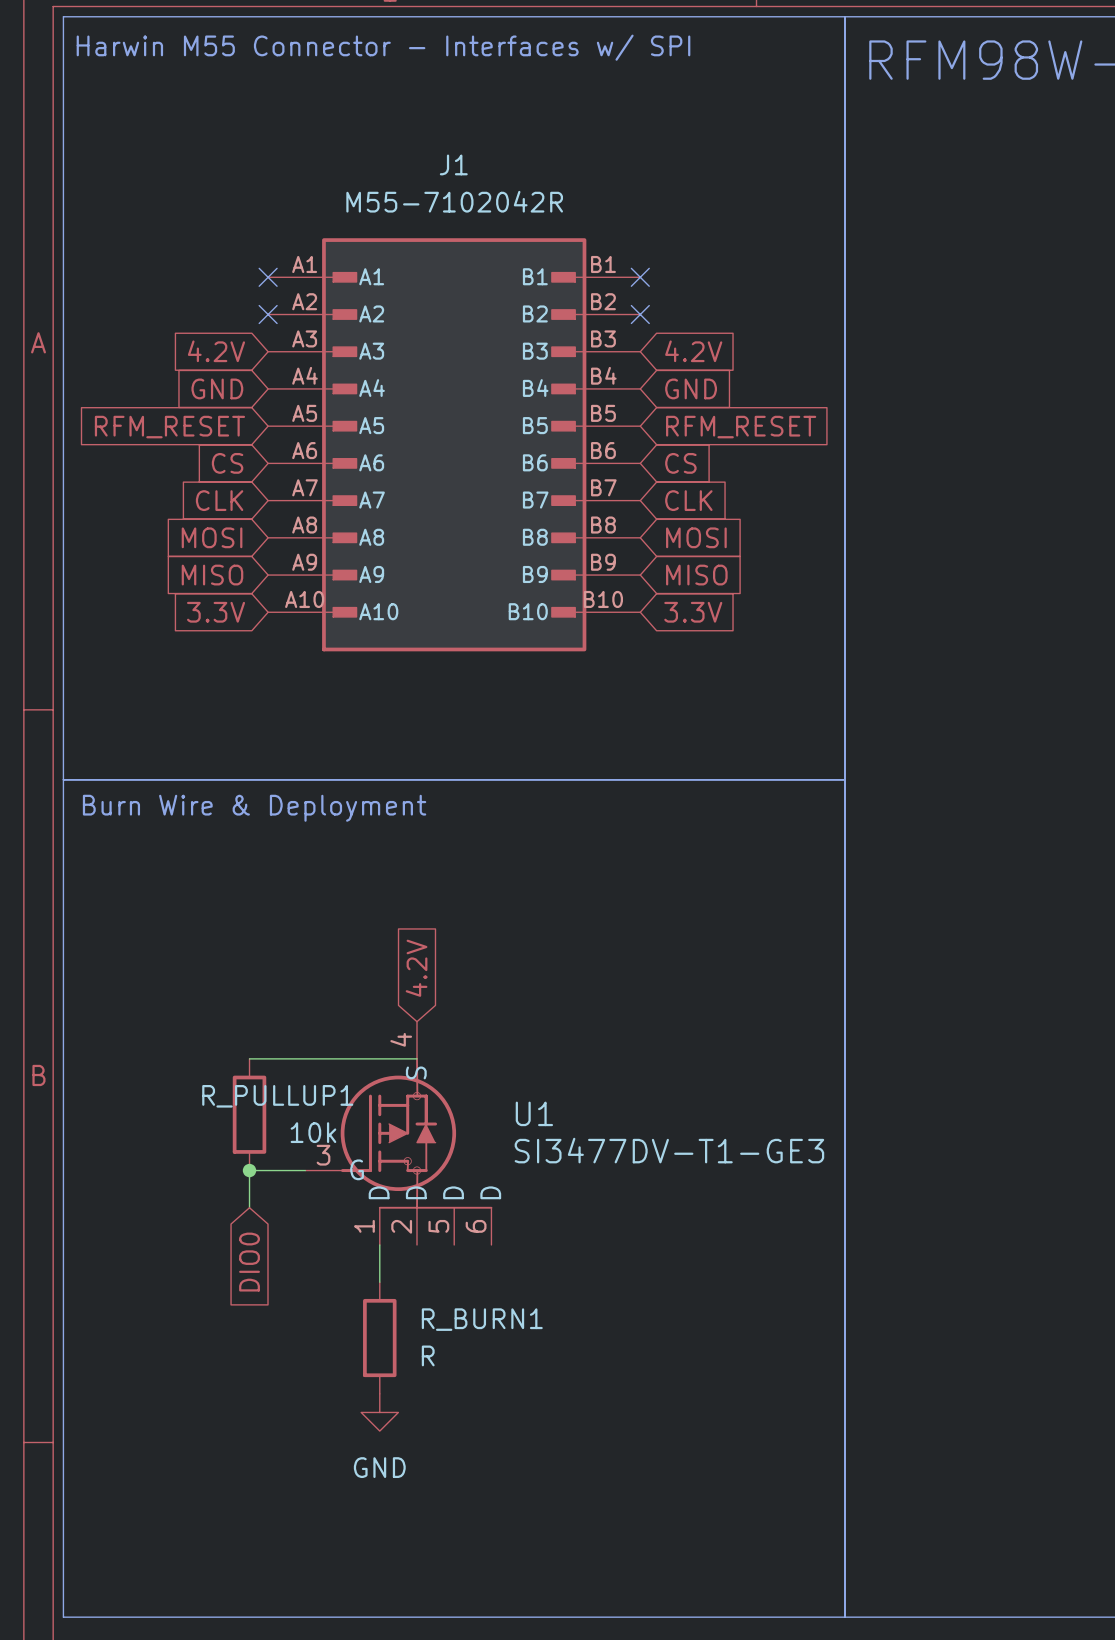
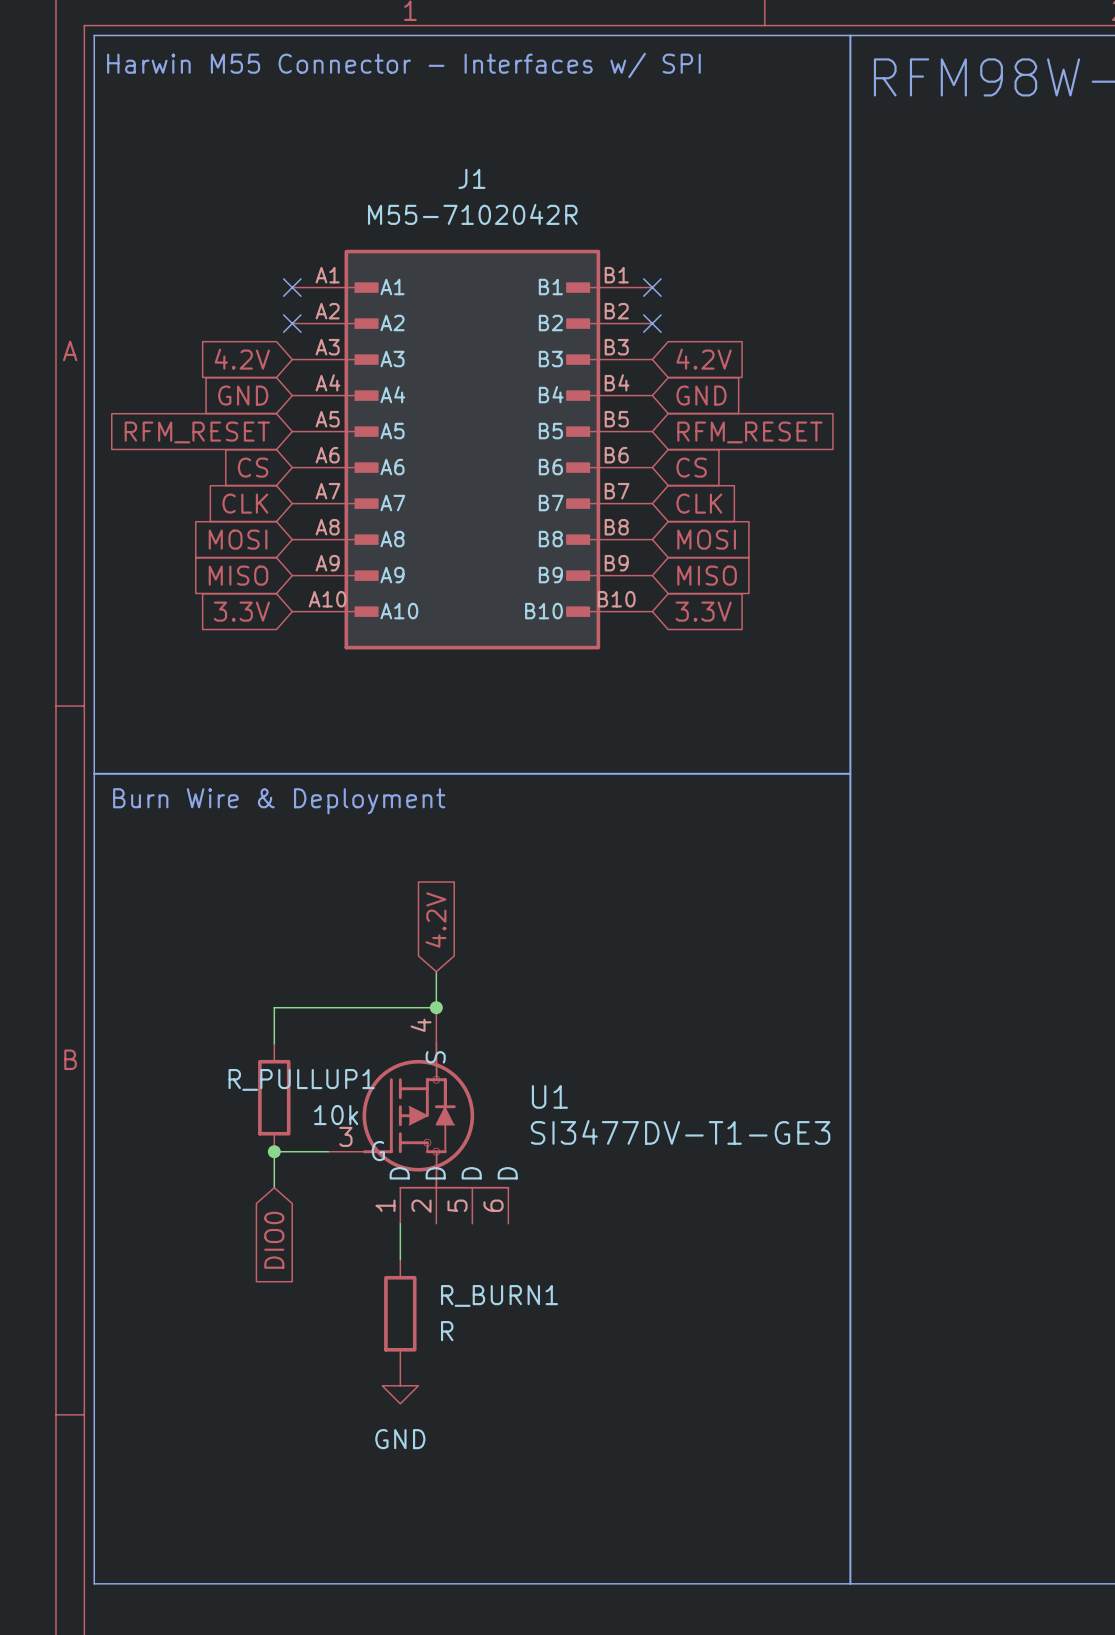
global label position: 4.2V (416, 968) -> 4.2V (435, 920)
junction: none -> (436, 1007)
wire: (249, 1058) (417, 1058) -> (274, 1043) (274, 1007) (436, 1007) (436, 971)

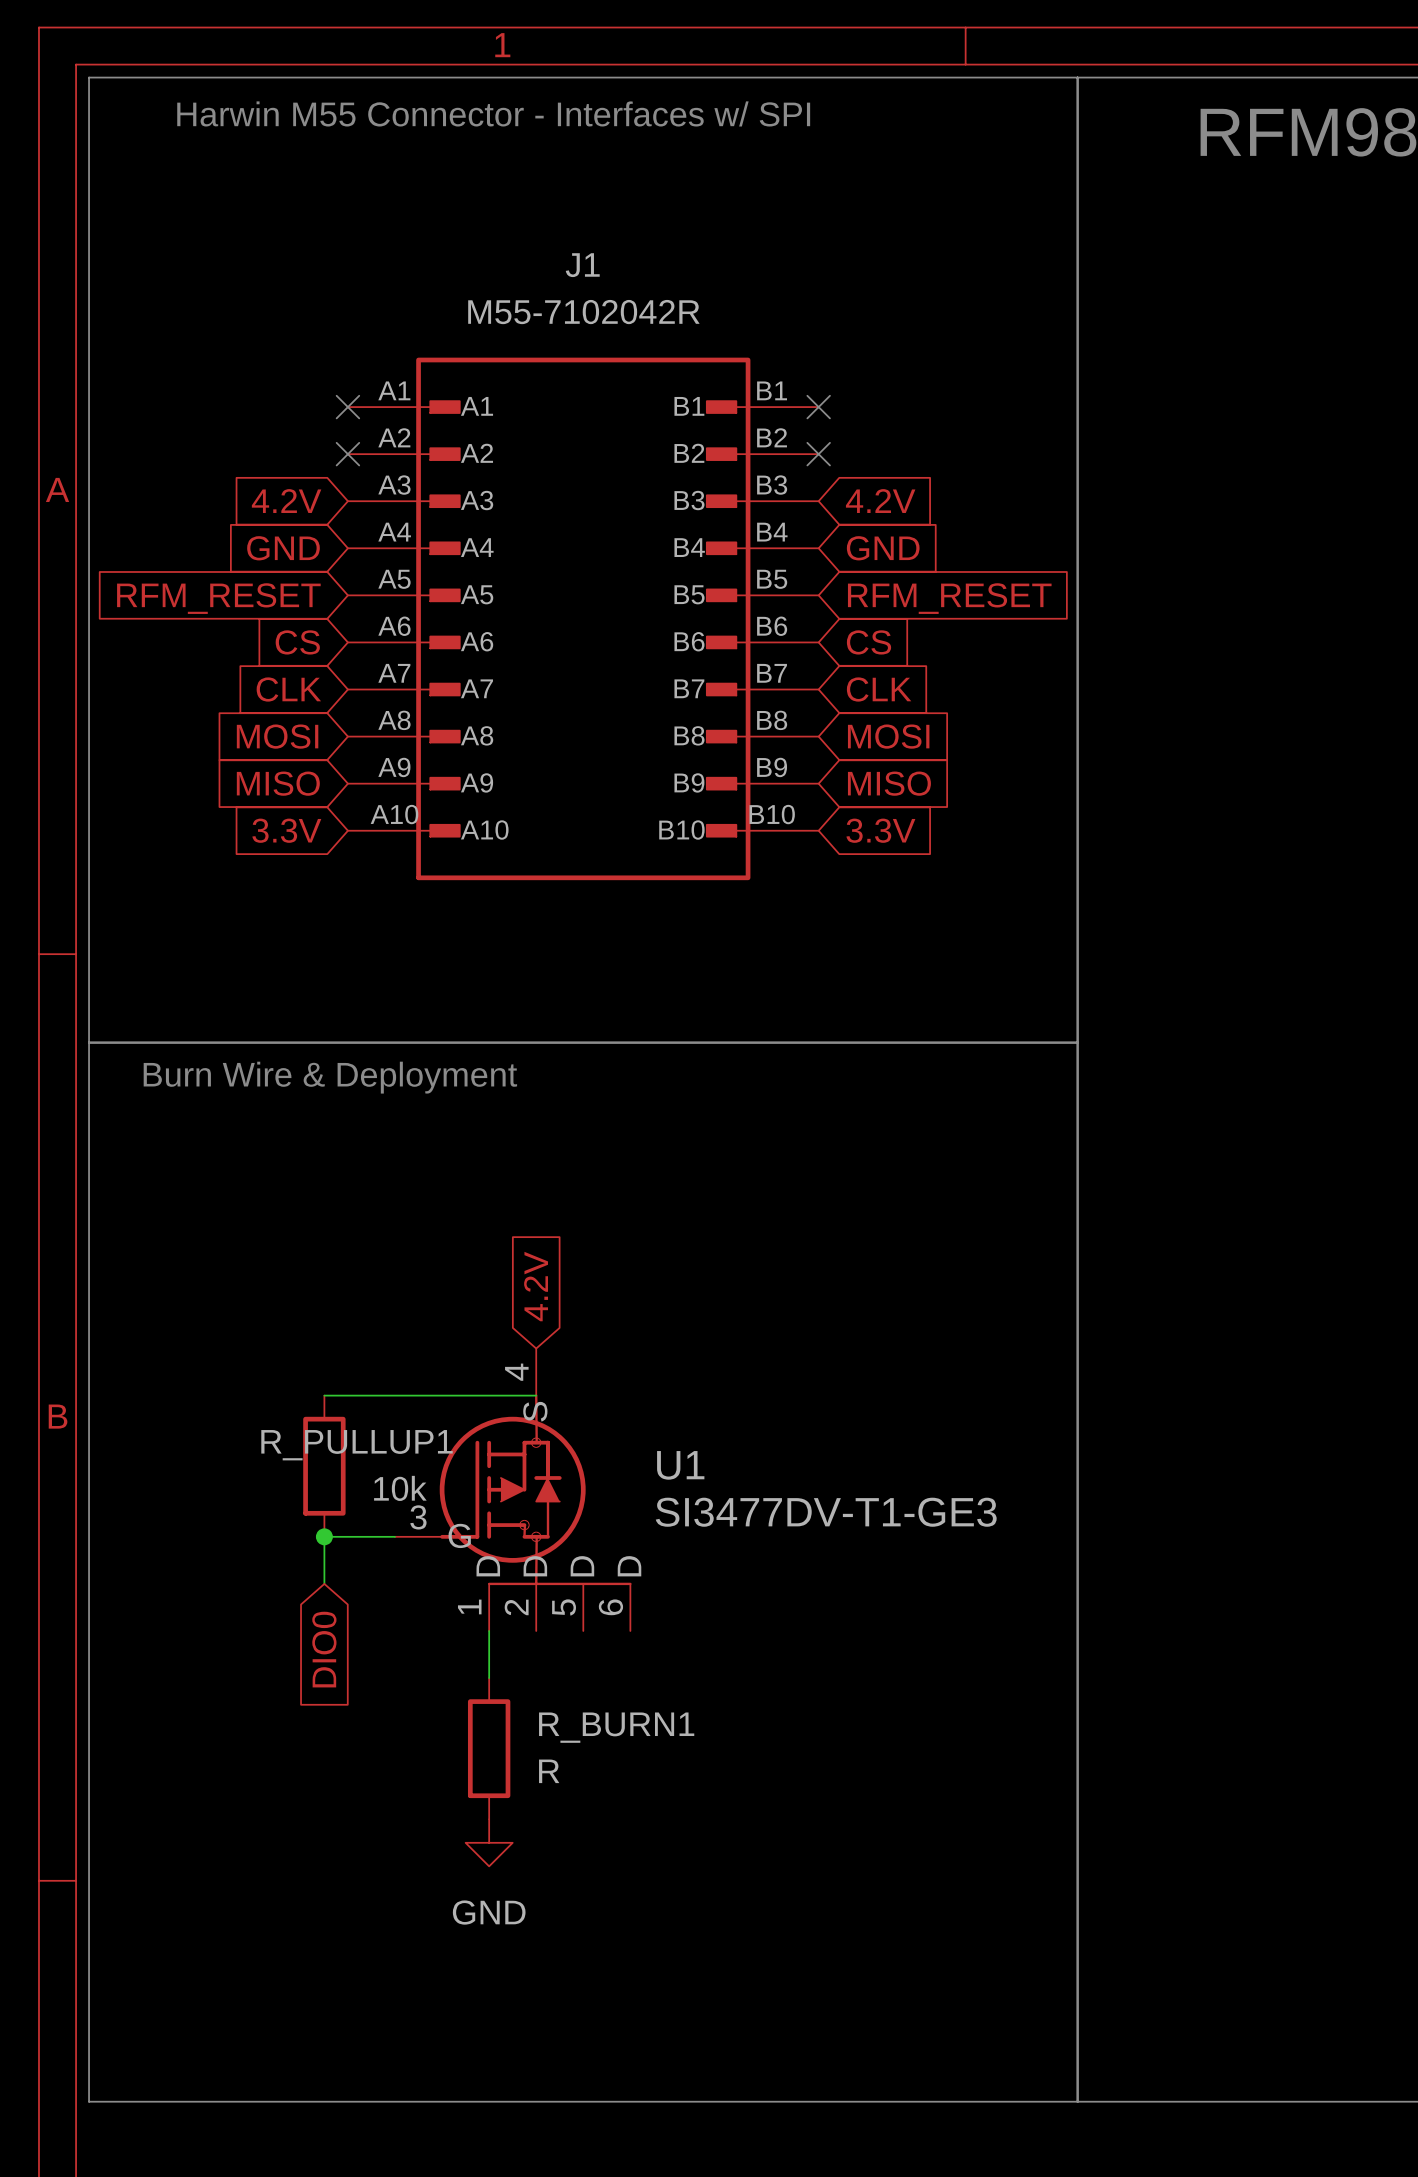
global label position: 4.2V (435, 920) -> 4.2V (536, 1286)
wire: (436, 971) (436, 1007) (274, 1007) (274, 1043) -> (536, 1395) (324, 1395)
junction: (436, 1007) -> none

